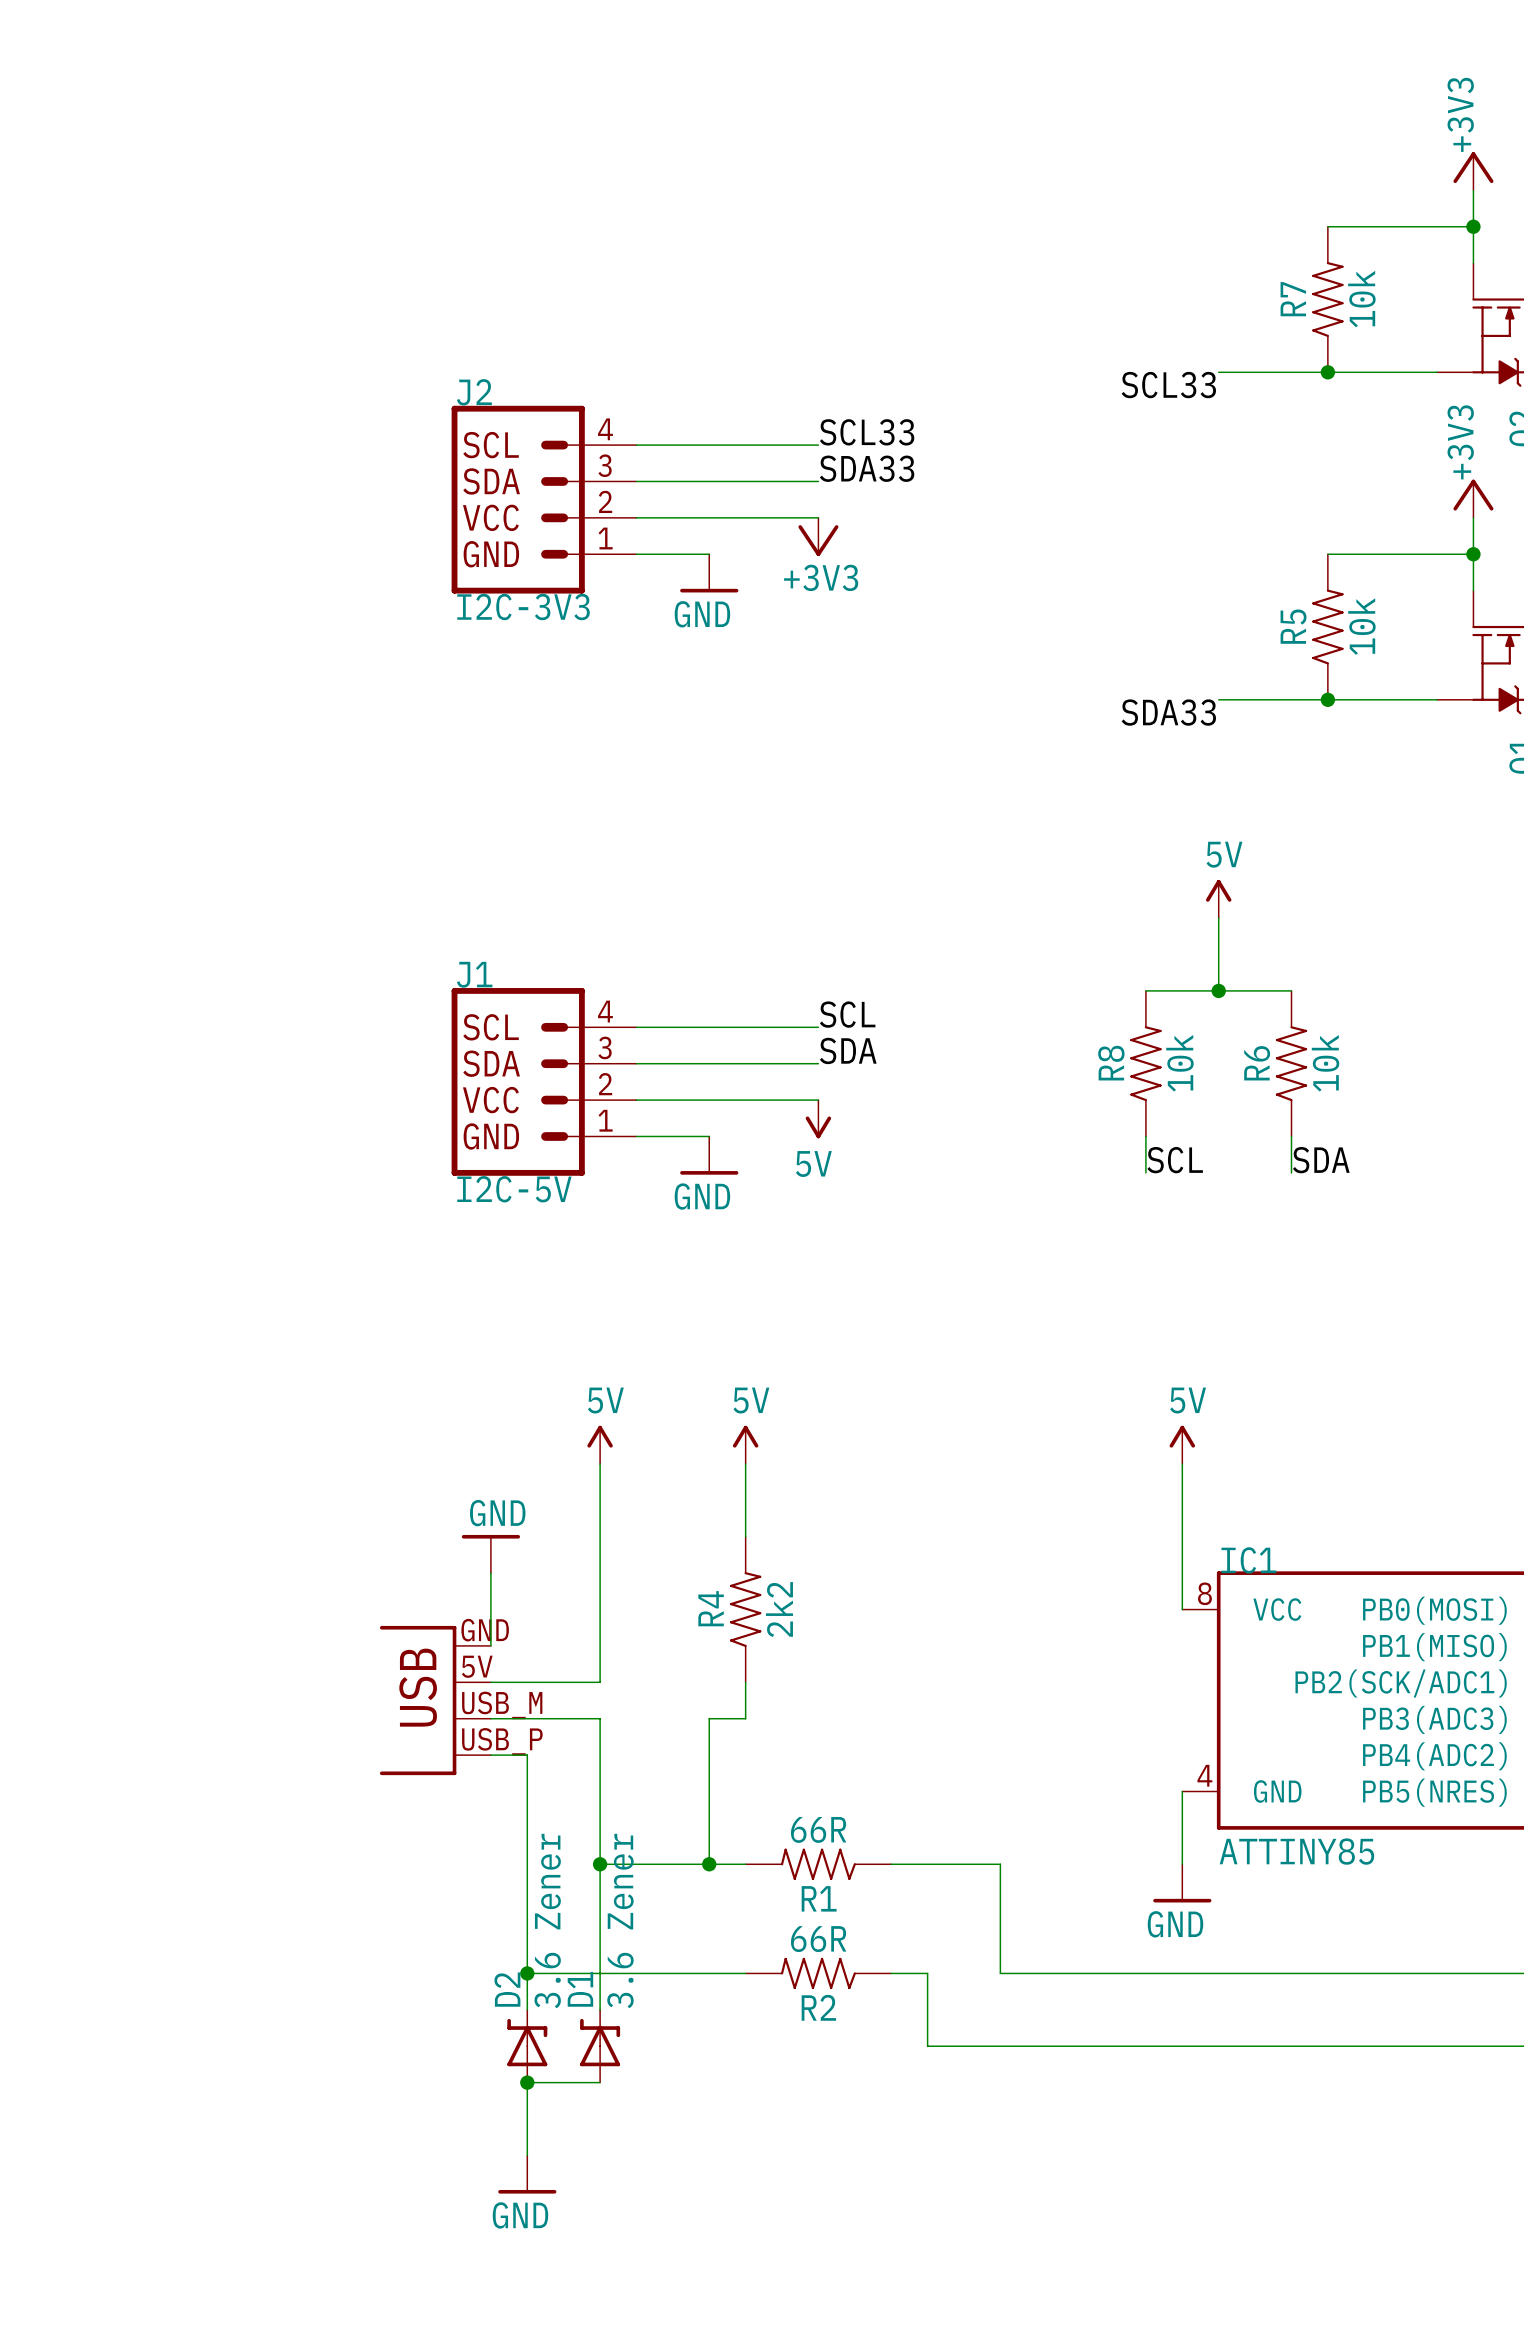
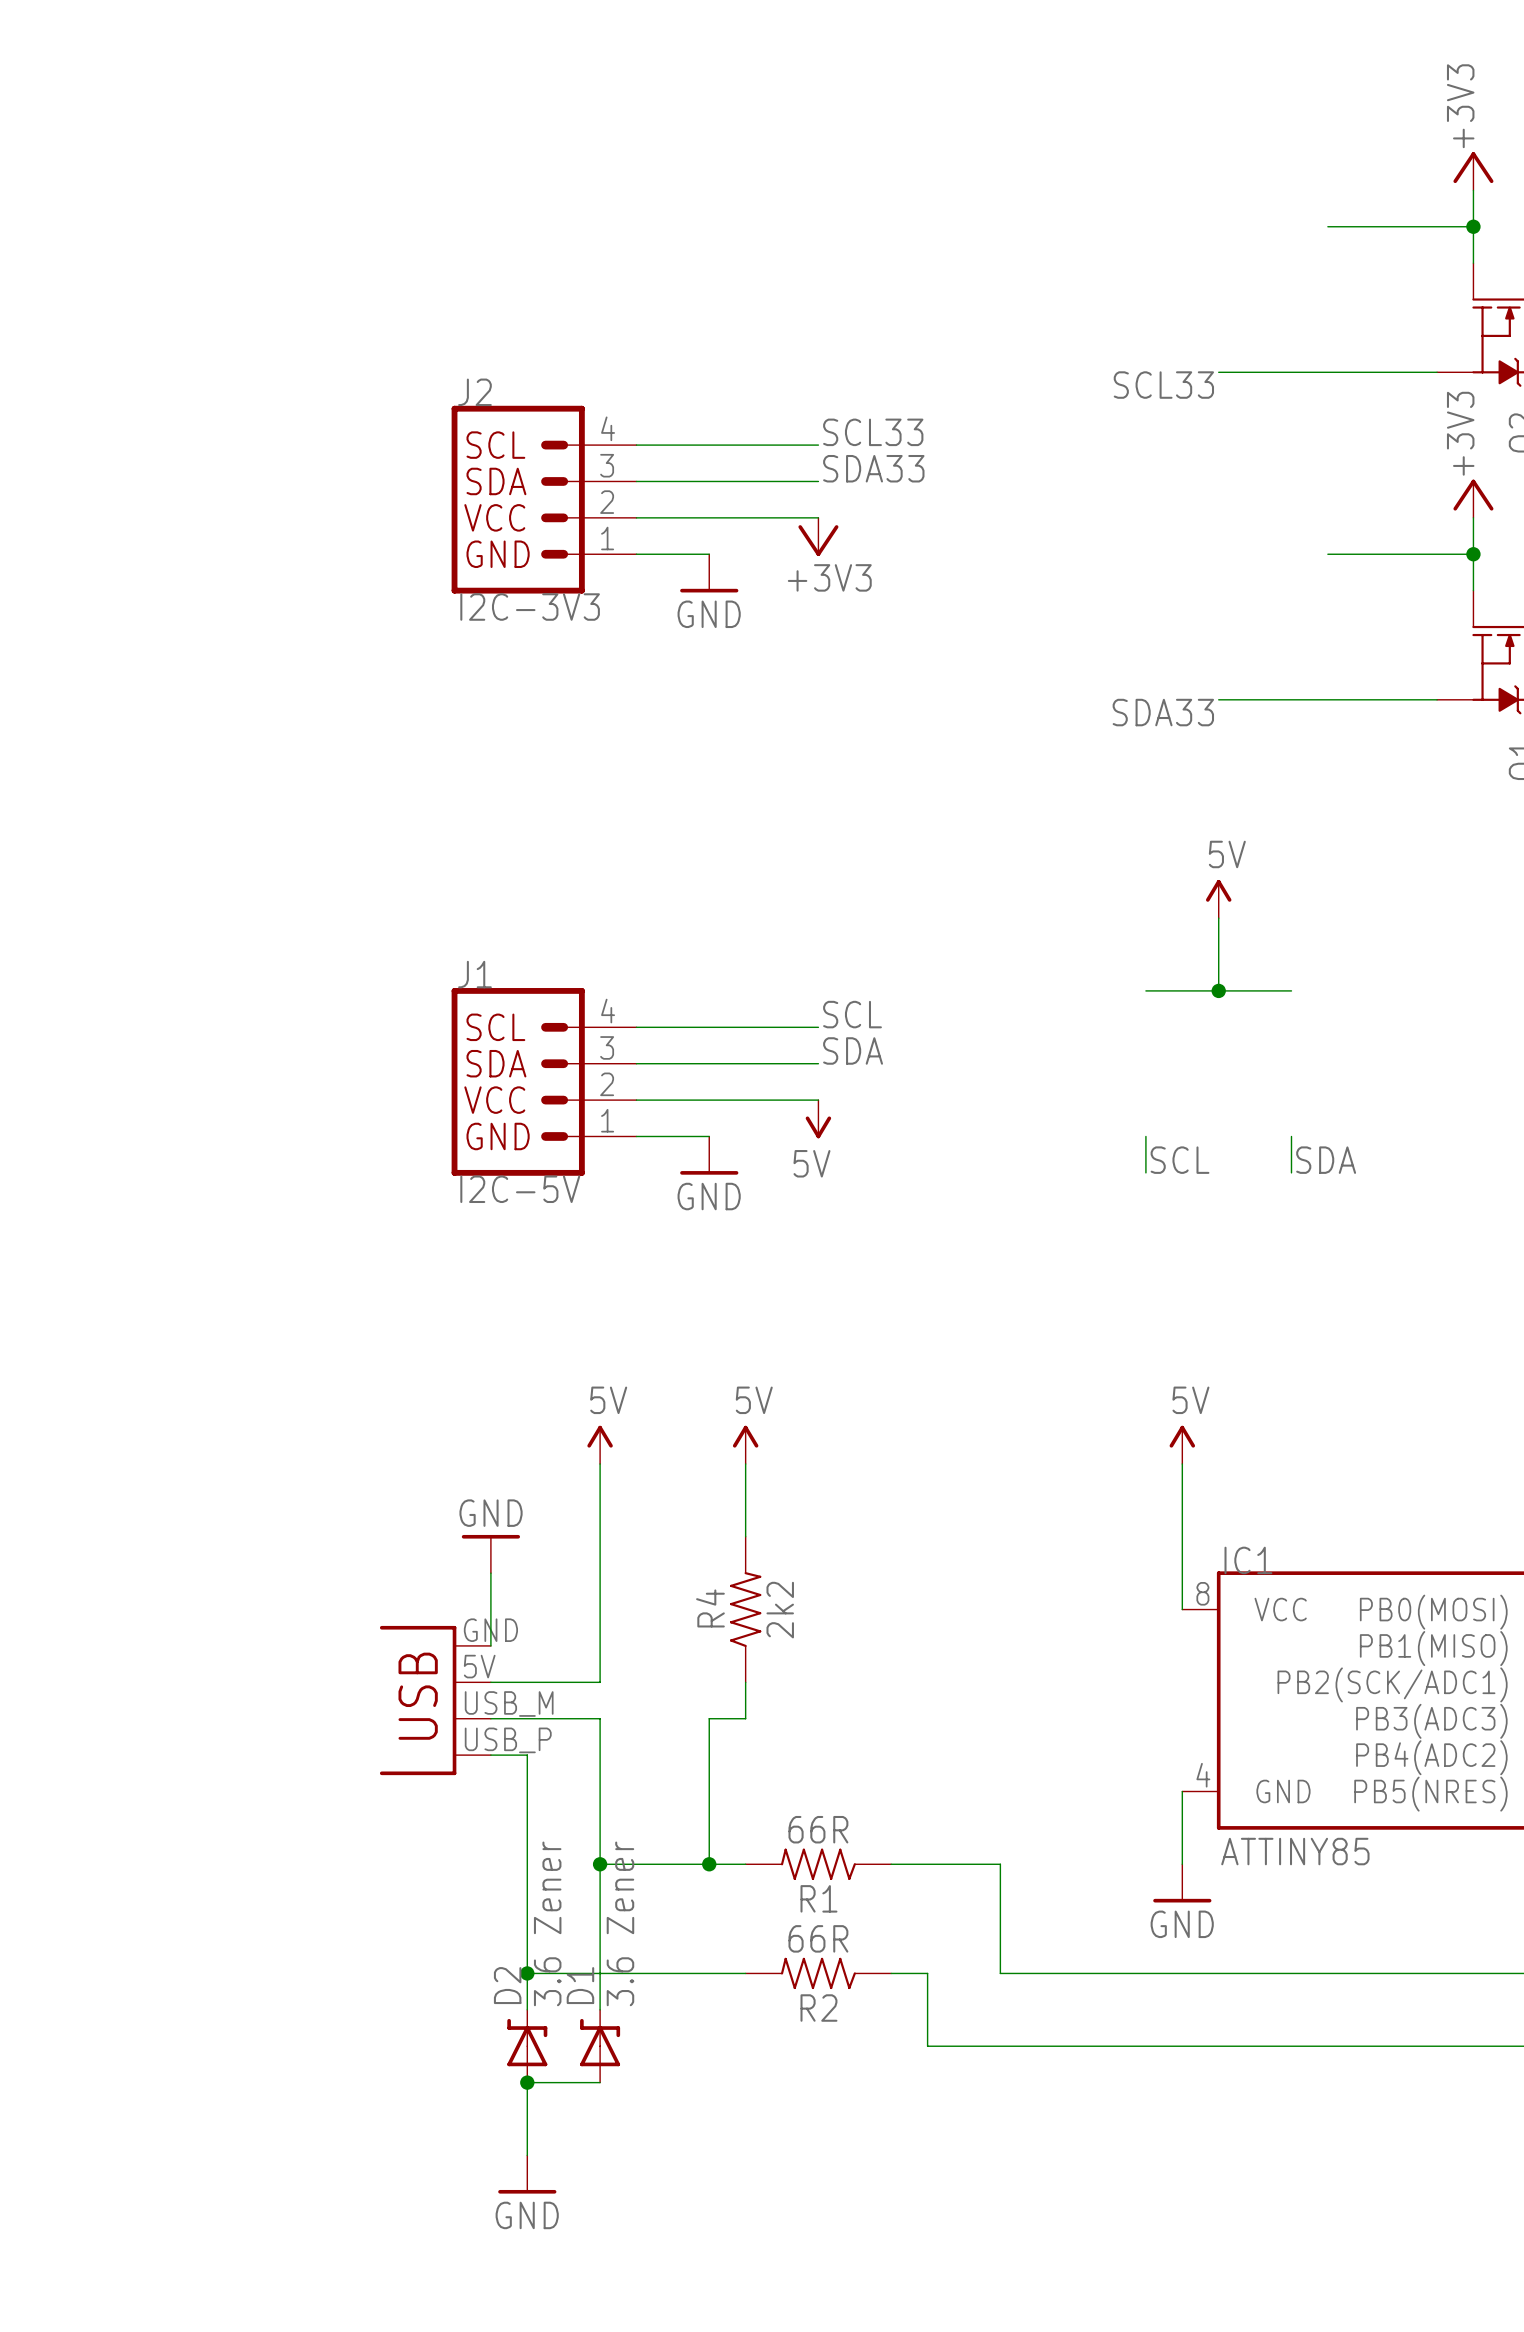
R7: 10k (1327, 299) -> none
junction: (1327, 372) -> none
R5: 10k (1327, 627) -> none
junction: (1327, 699) -> none
R8: 10k (1145, 1063) -> none
R6: 10k (1291, 1063) -> none

